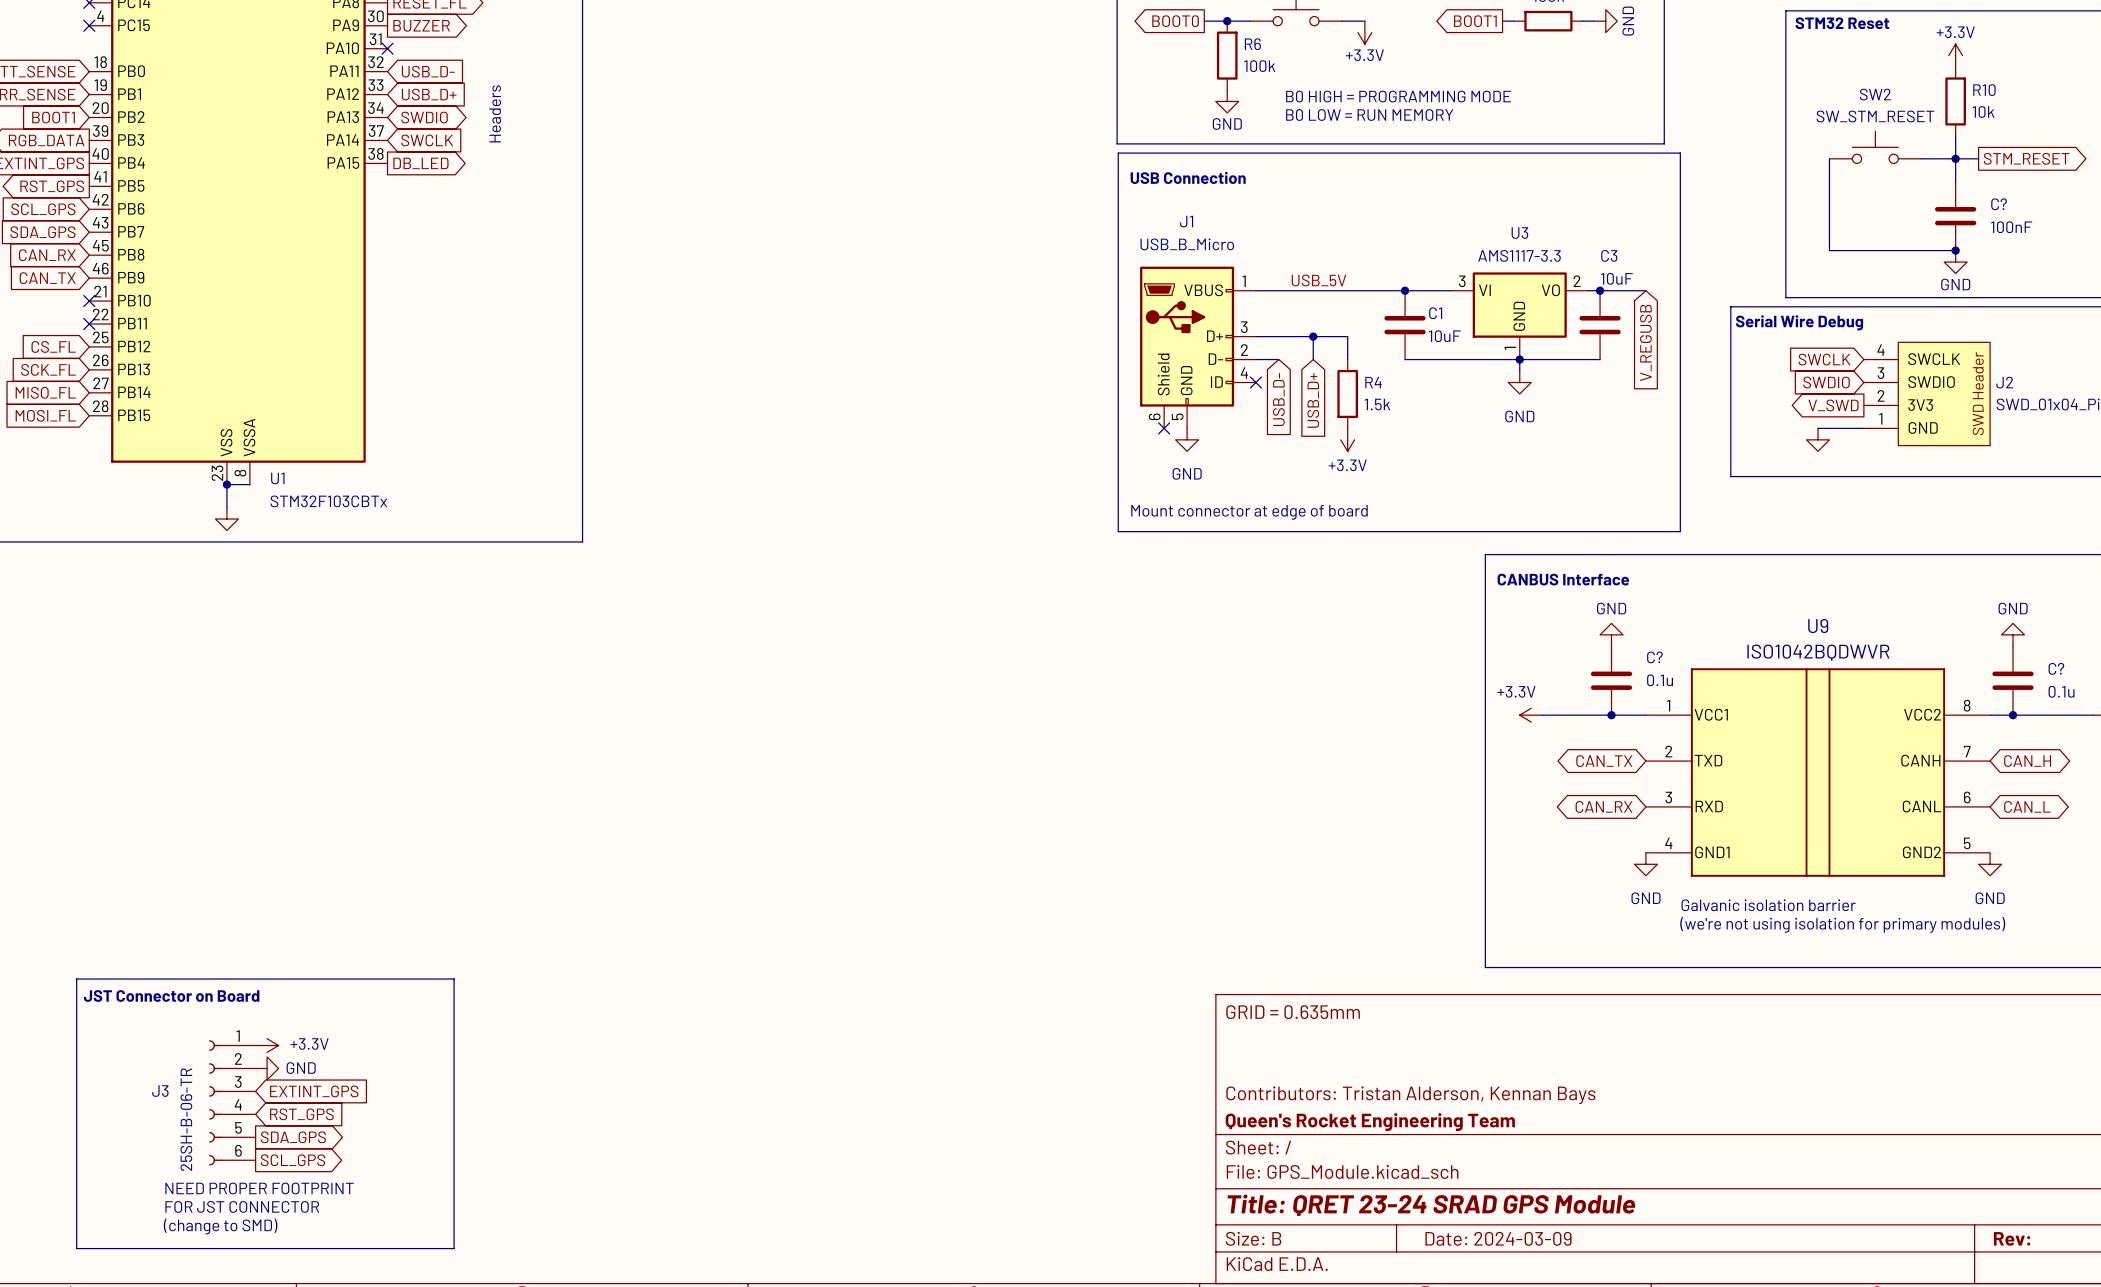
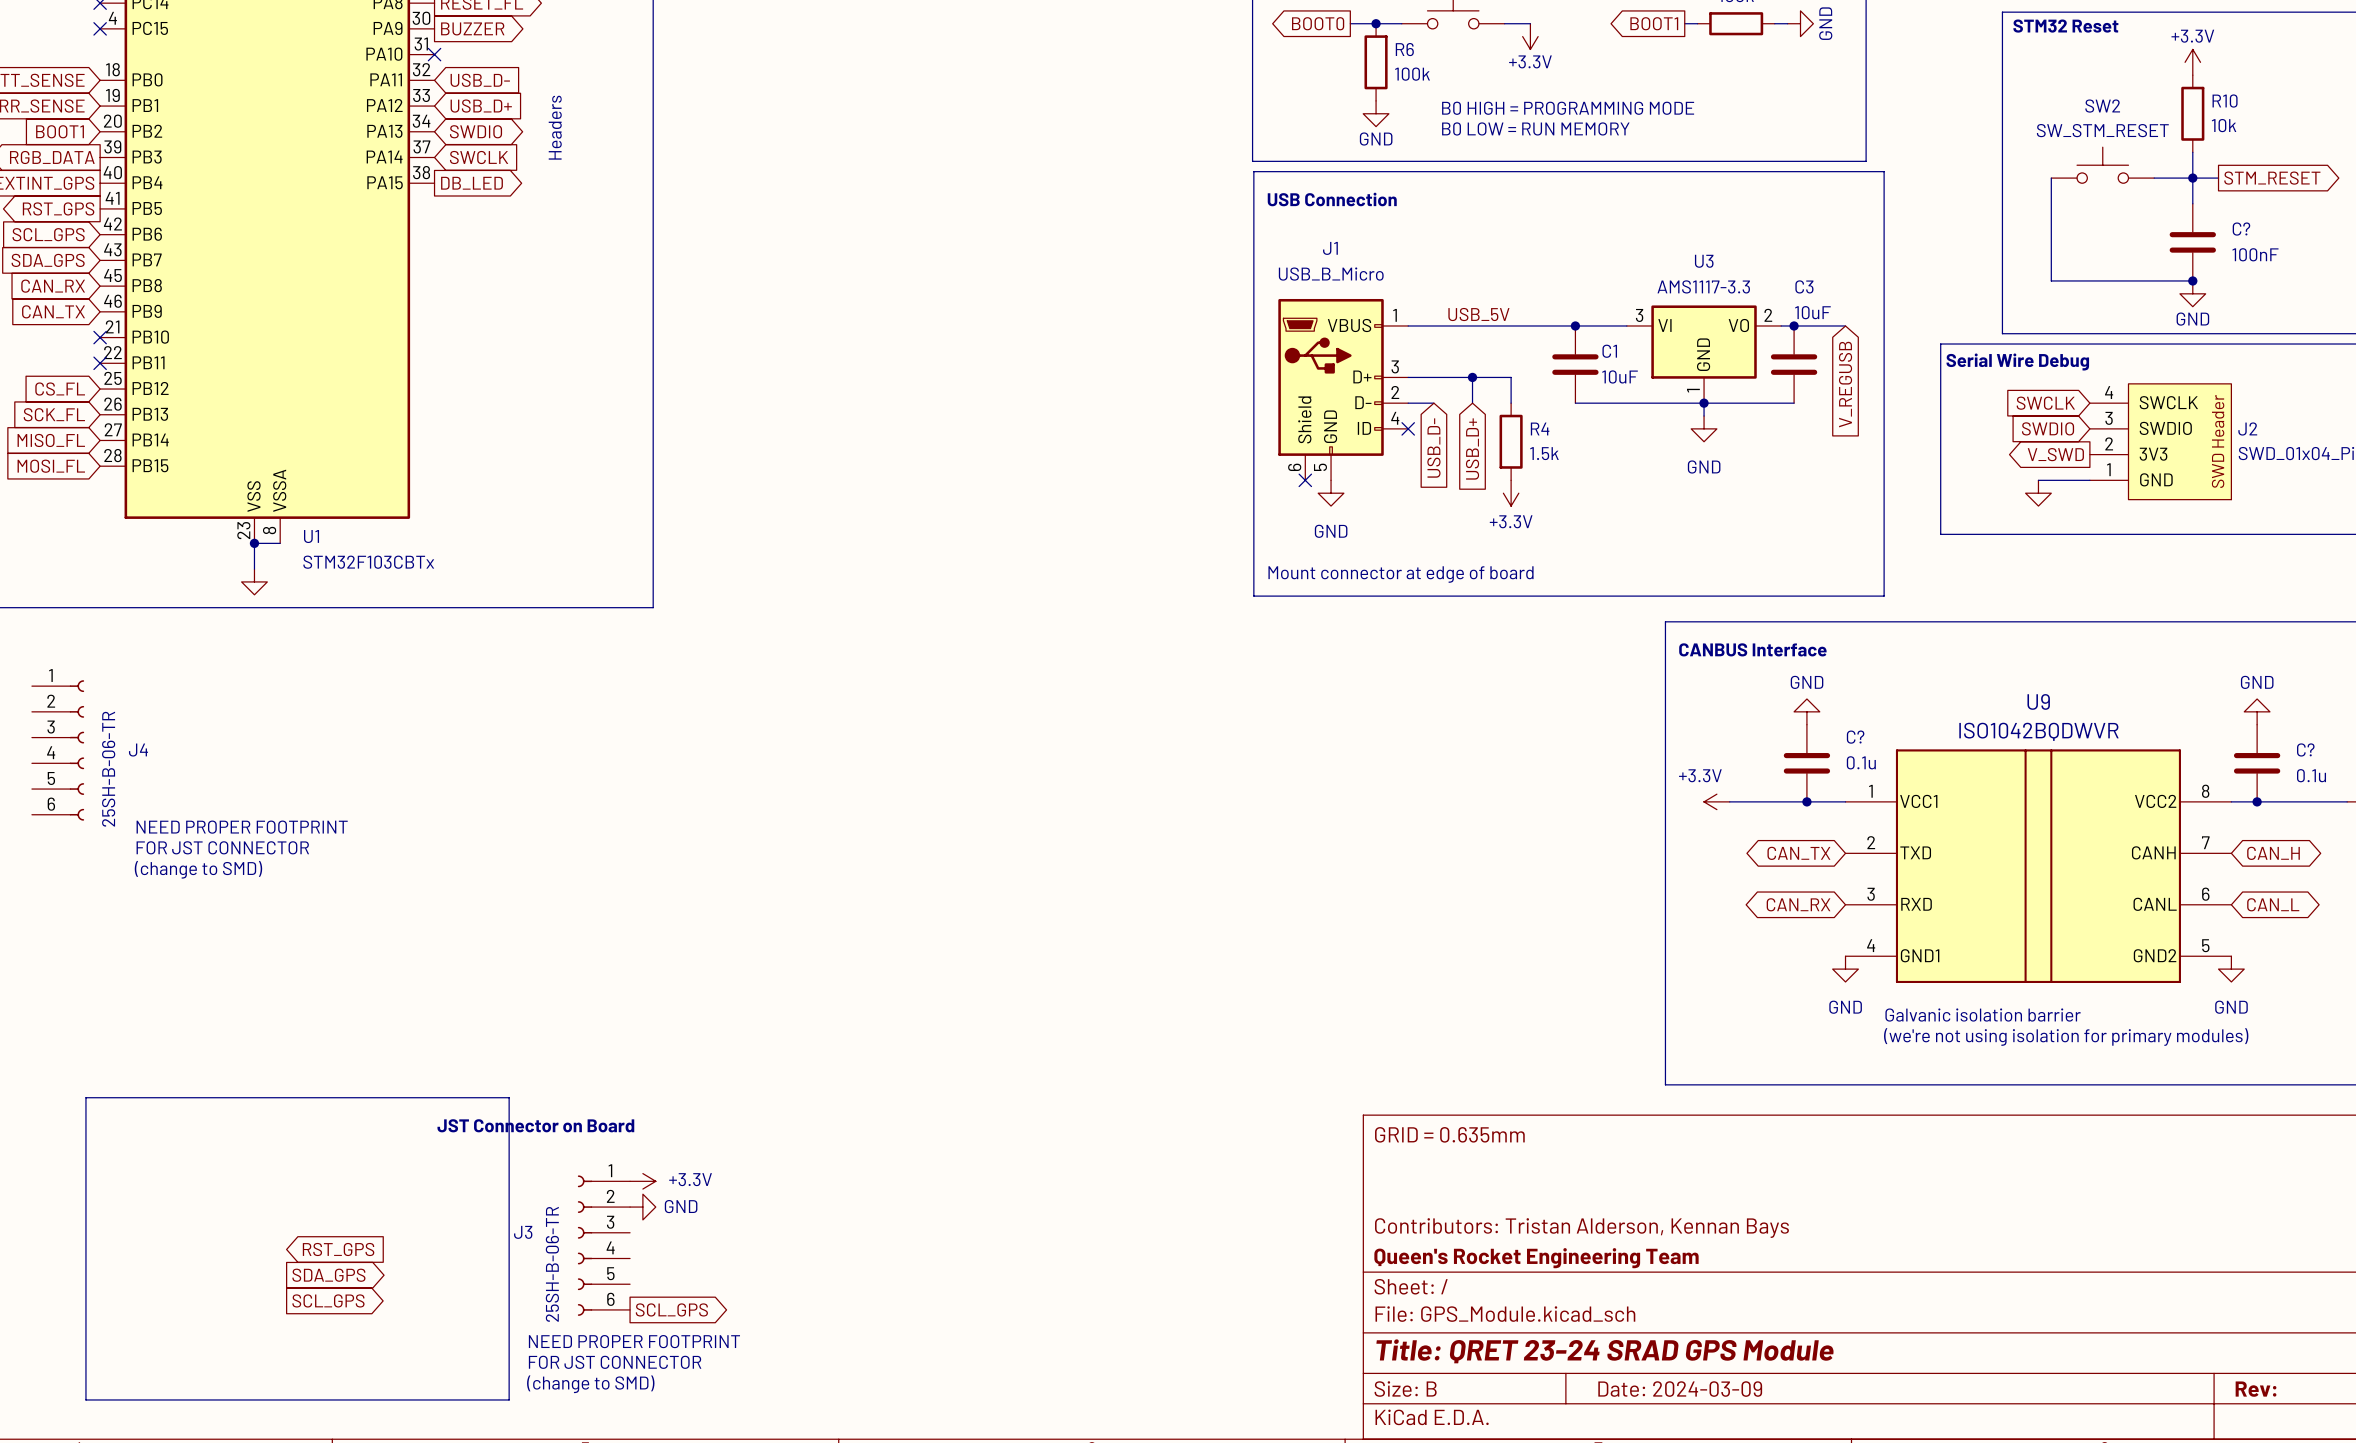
J4: none -> 25SH-B-06-TR (58, 750)
text: none -> NEED PROPER FOOTPRINT (242, 827)
text: none -> FOR JST CONNECTOR (222, 847)
text: none -> (change to SMD) (198, 869)
text: JST Connector on Board (171, 995) -> none
text: none -> JST Connector on Board (535, 1125)
power symbol: +3.3V (267, 1045) -> none
power symbol: none -> +3.3V (642, 1181)
power symbol: GND (267, 1068) -> none
power symbol: none -> GND (642, 1207)
global label: EXTINT_GPS (314, 1091) -> none
J3: 25SH-B-06-TR (232, 1102) -> none
J3: none -> 25SH-B-06-TR (603, 1245)
global label: none -> SCL_GPS (671, 1309)
text: NEED PROPER FOOTPRINT (259, 1188) -> none
text: none -> NEED PROPER FOOTPRINT (634, 1341)
text: FOR JST CONNECTOR (242, 1206) -> none
text: none -> FOR JST CONNECTOR (615, 1362)
text: (change to SMD) (220, 1226) -> none
text: none -> (change to SMD) (590, 1384)

